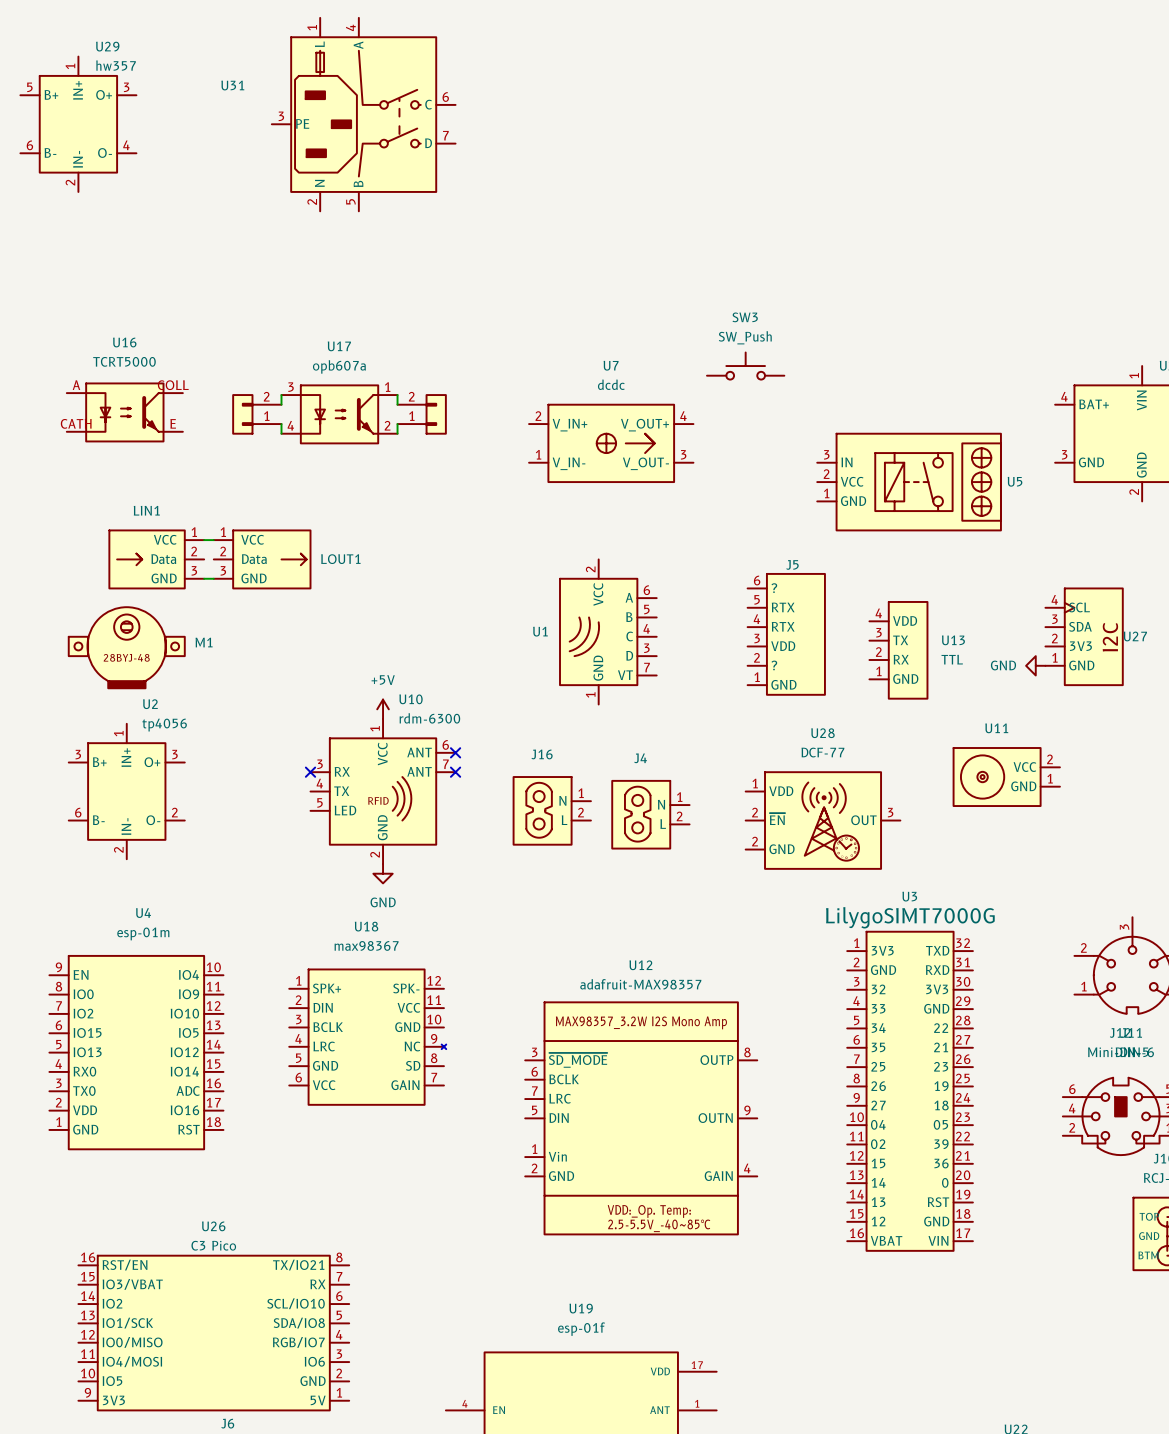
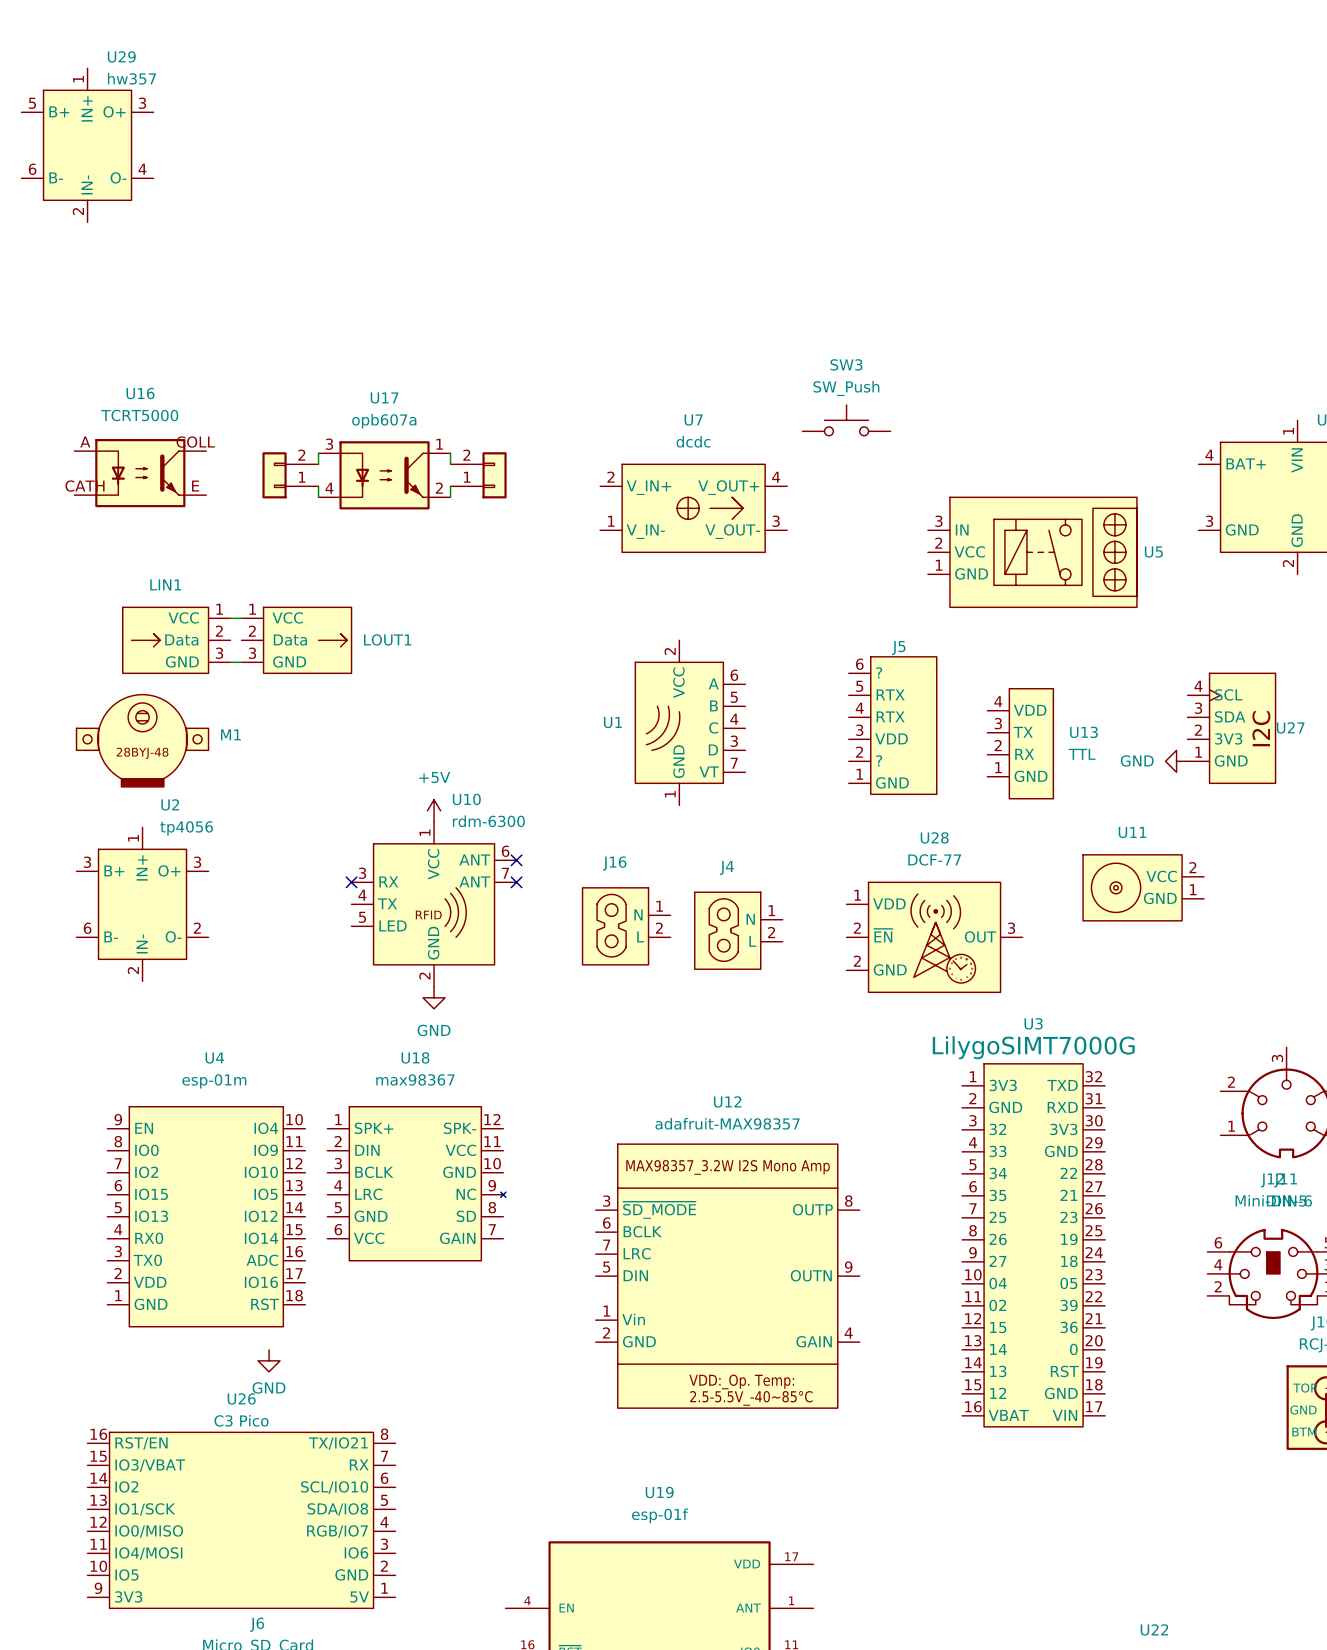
U31: (363, 114) -> none
U4 position: (136, 1052) -> (206, 1216)
power symbol: none -> GND (269, 1360)

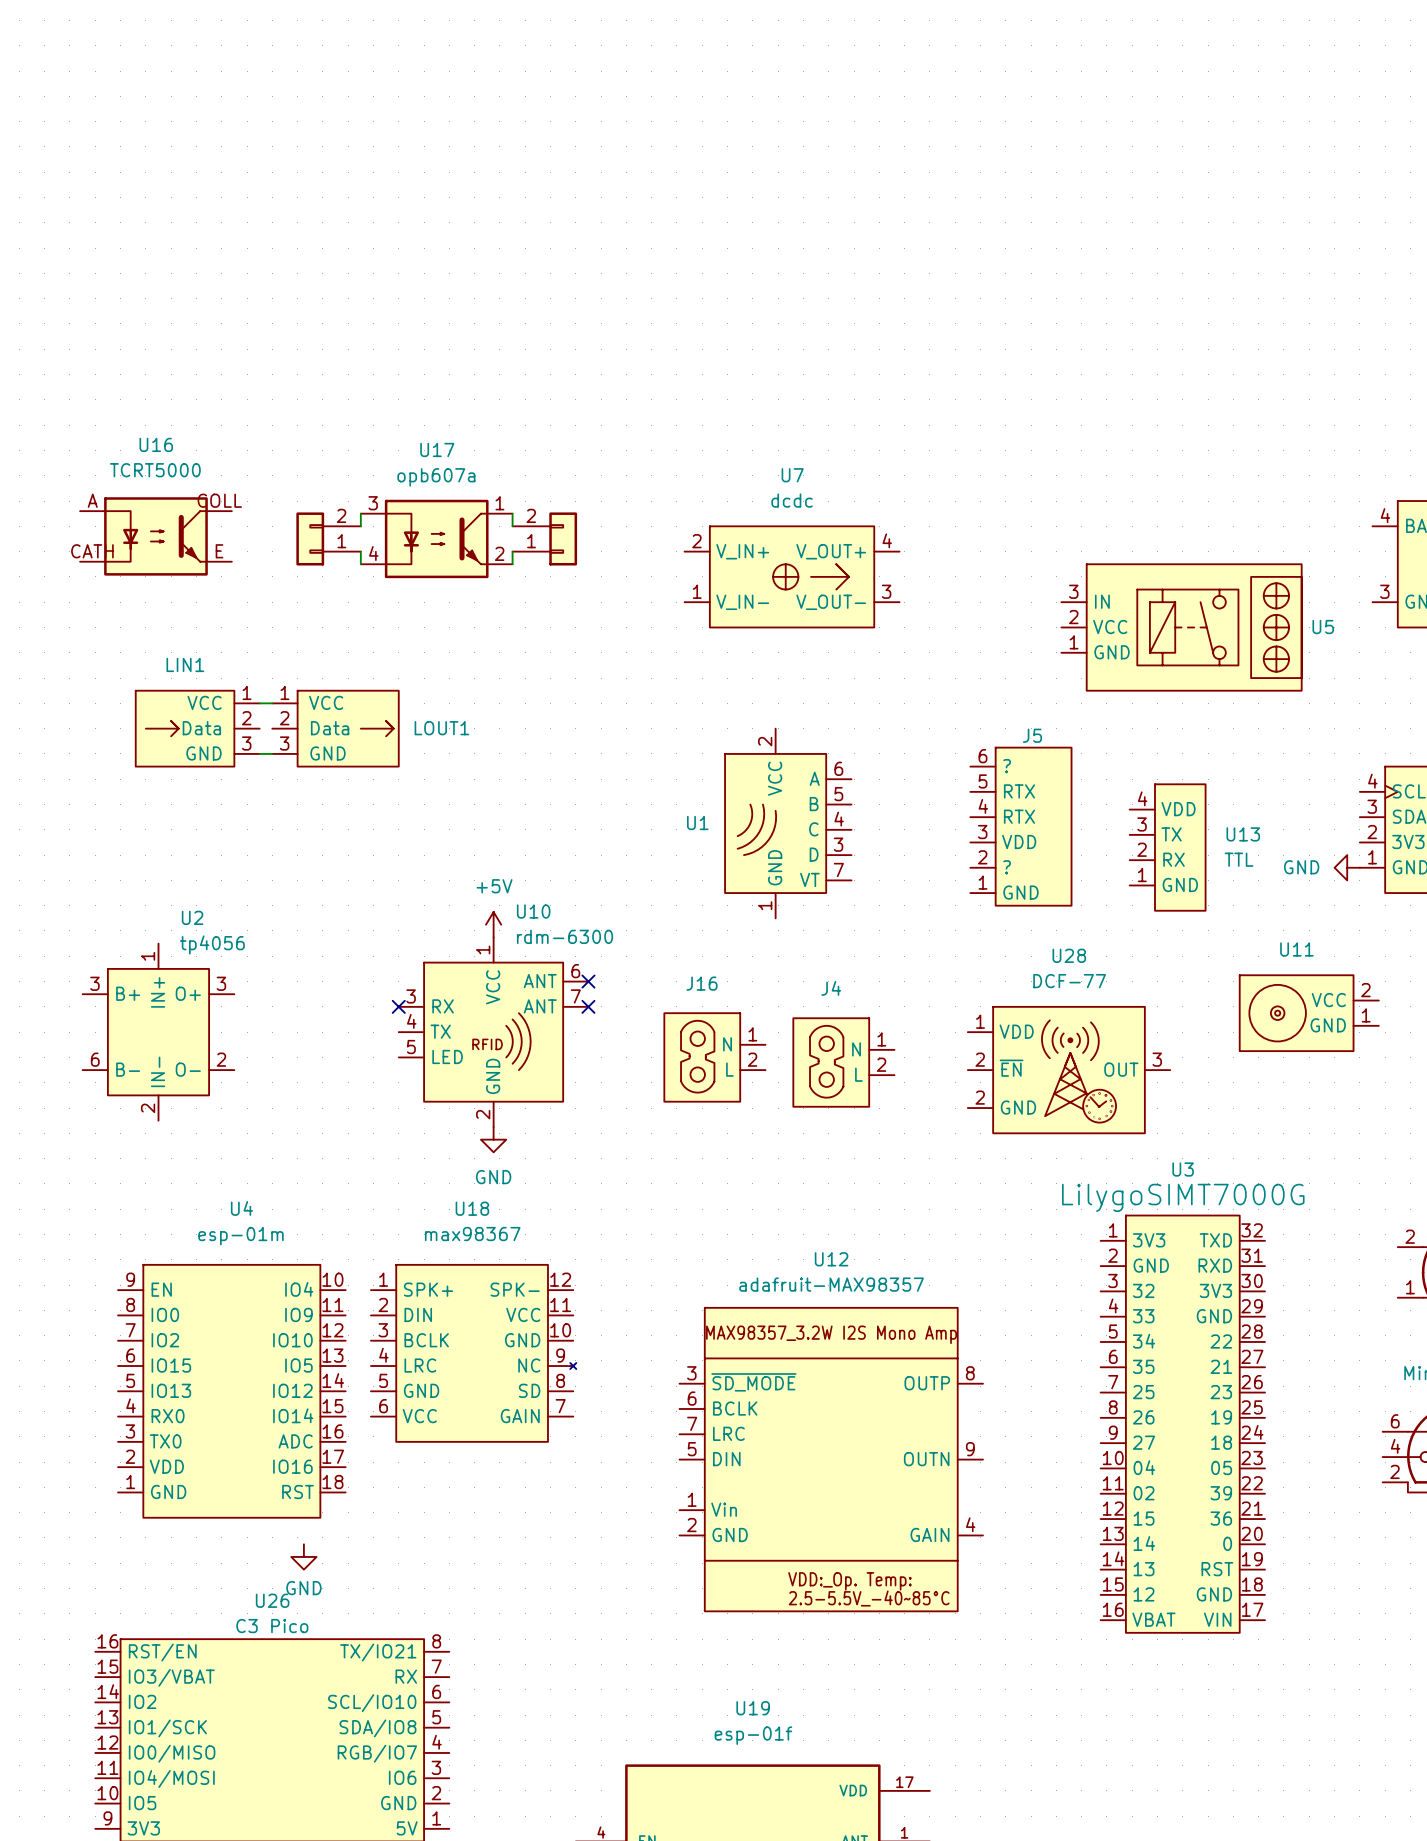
U29: hw357 (87, 145) -> none
SW3: SW_Push (846, 420) -> none
M1: (142, 740) -> none

